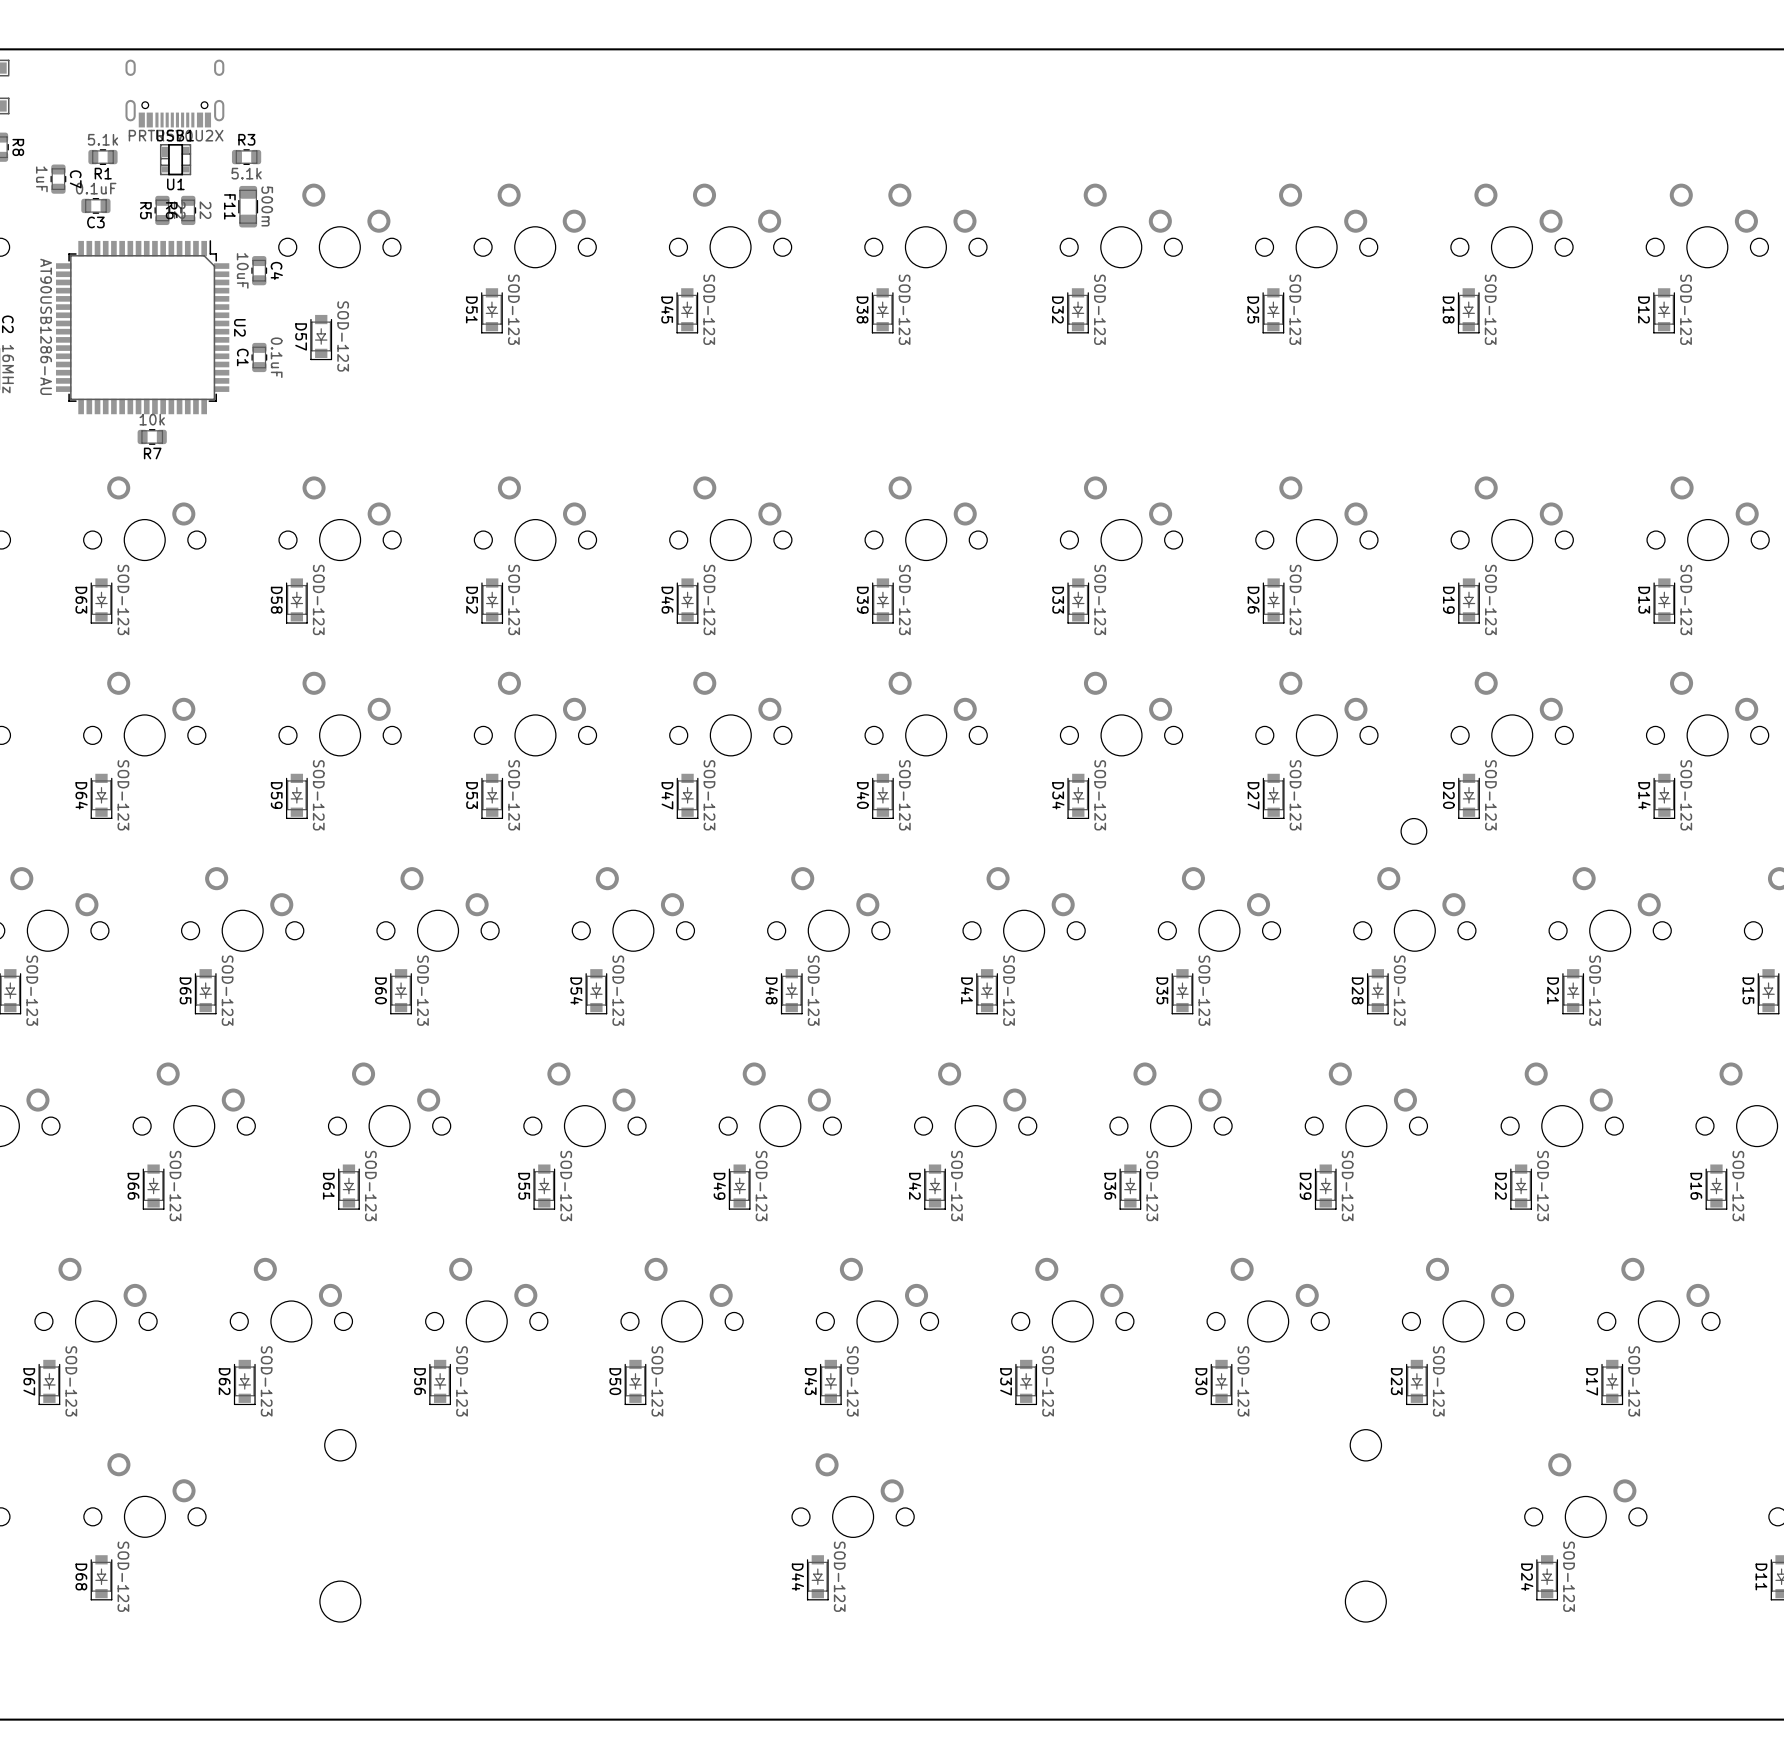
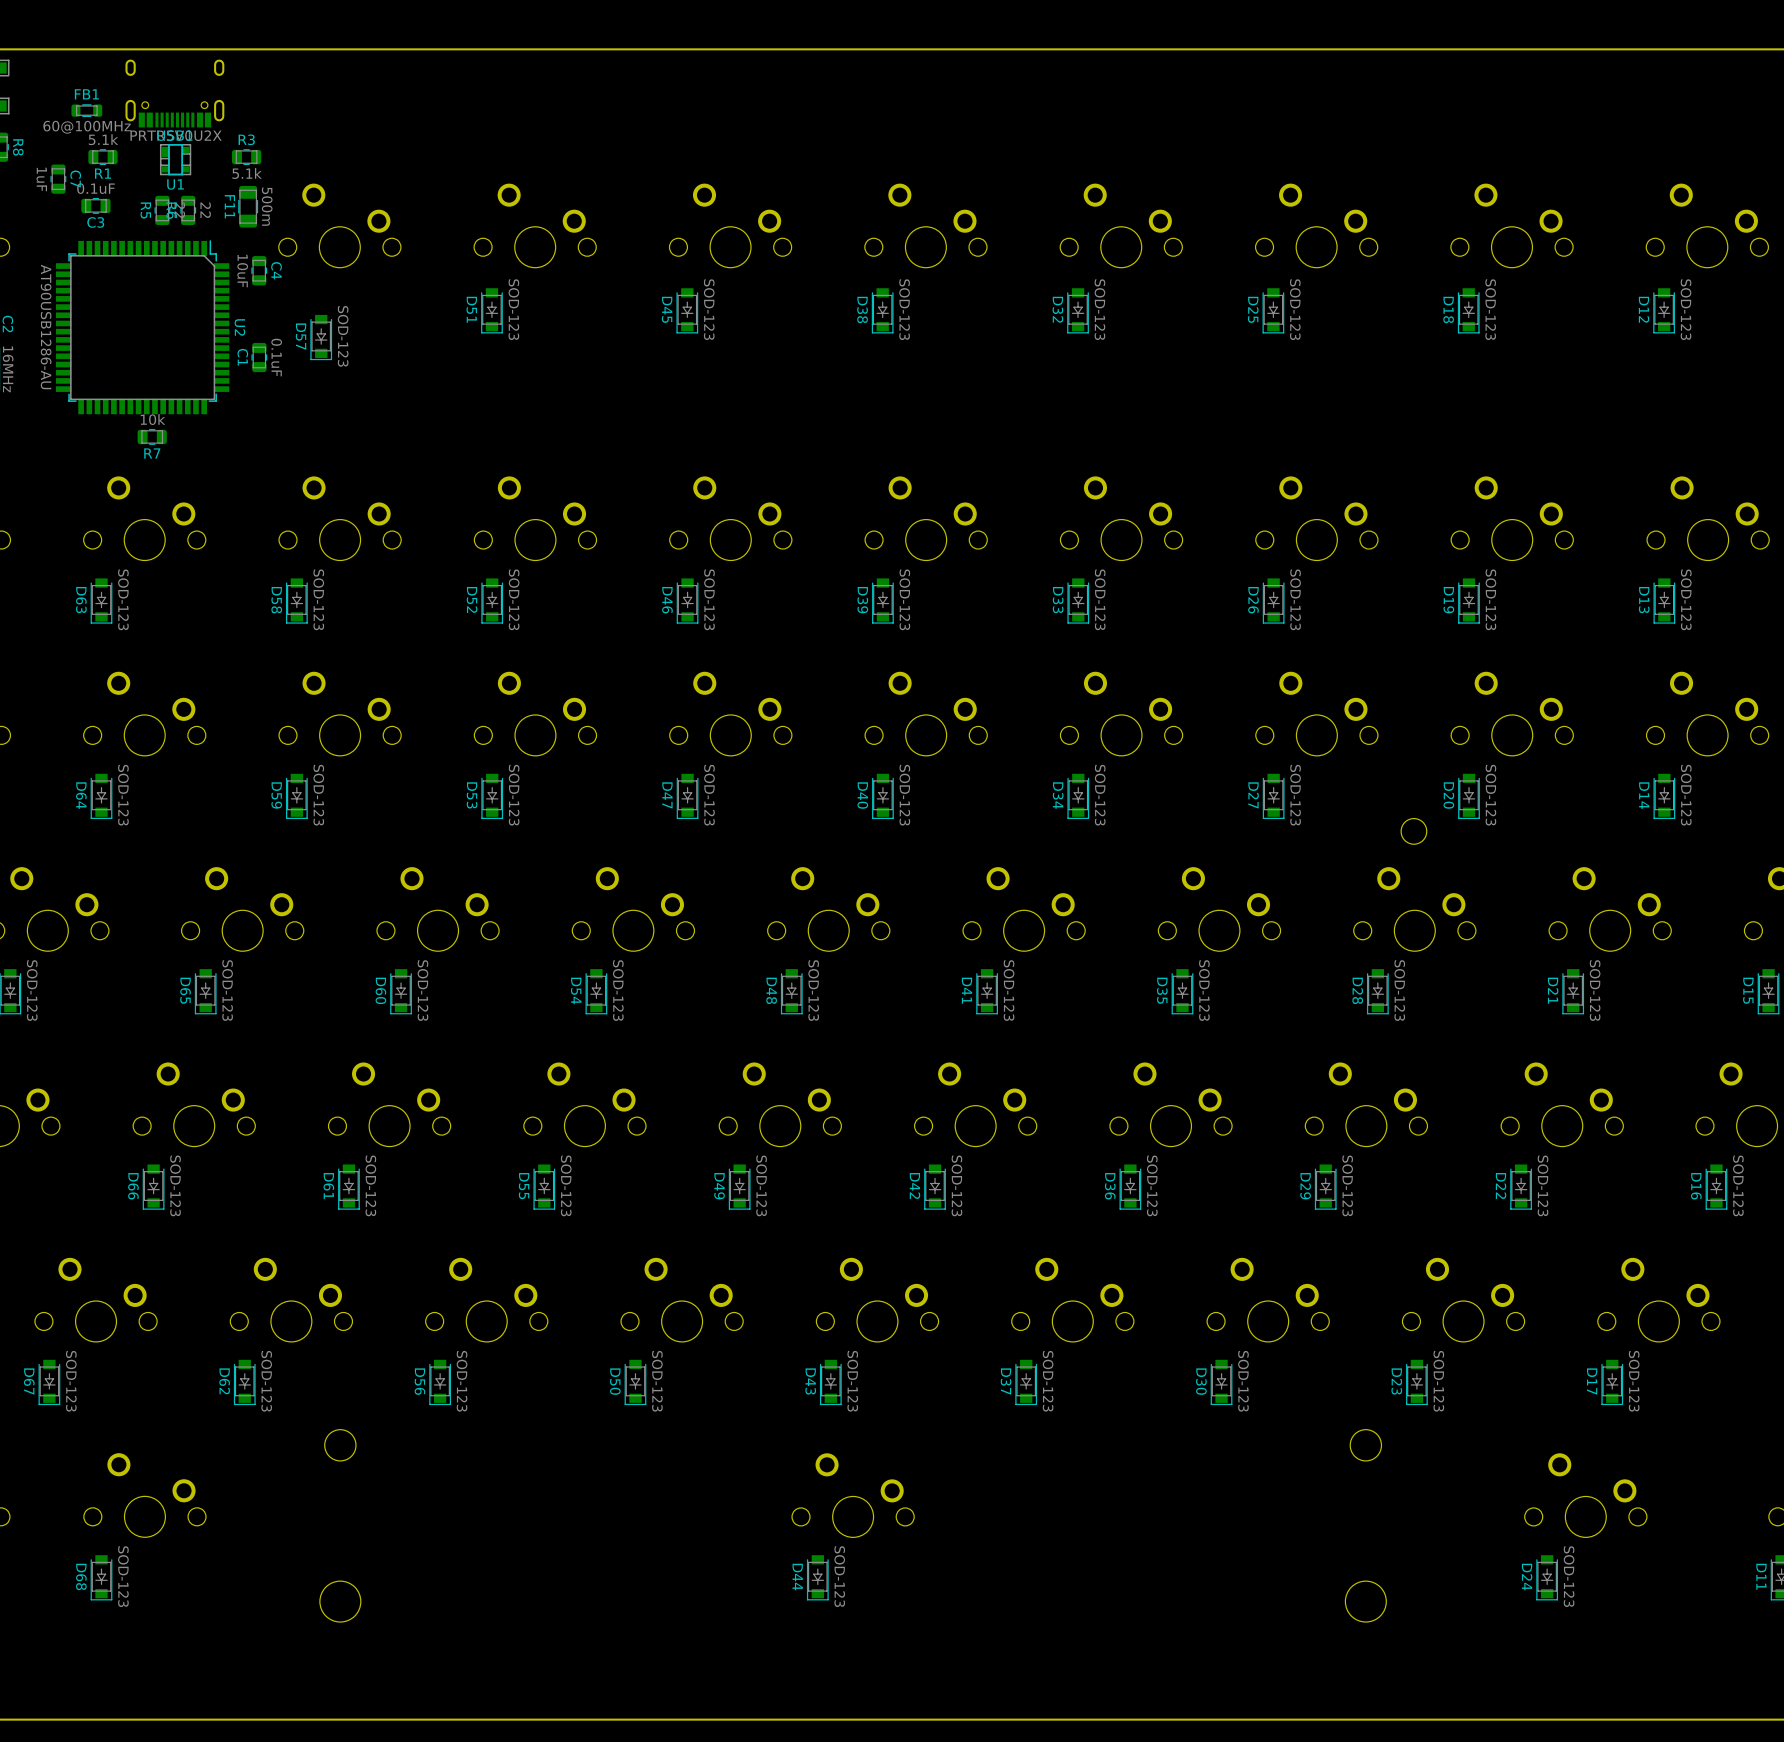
FB1: none -> 60@100MHz (86, 110)

